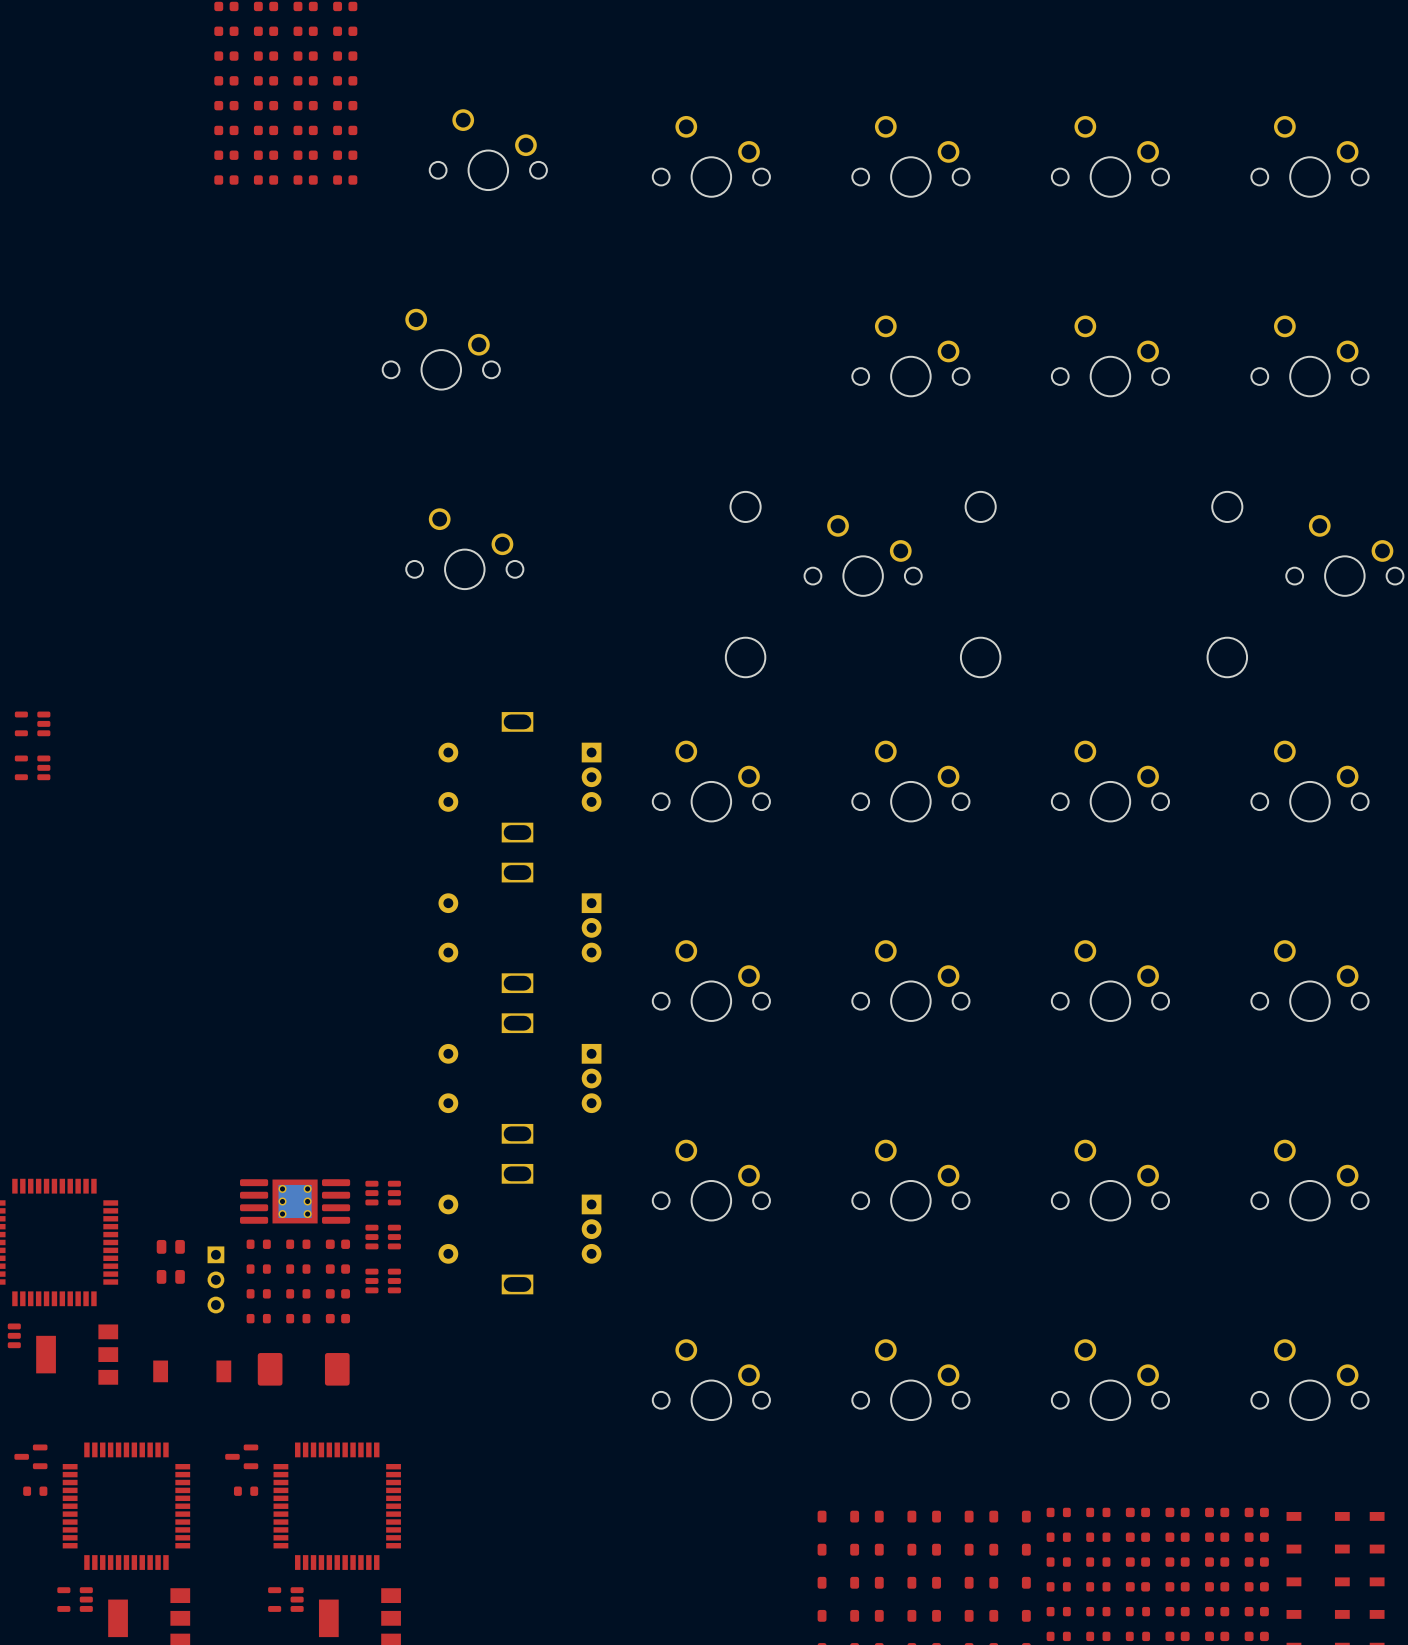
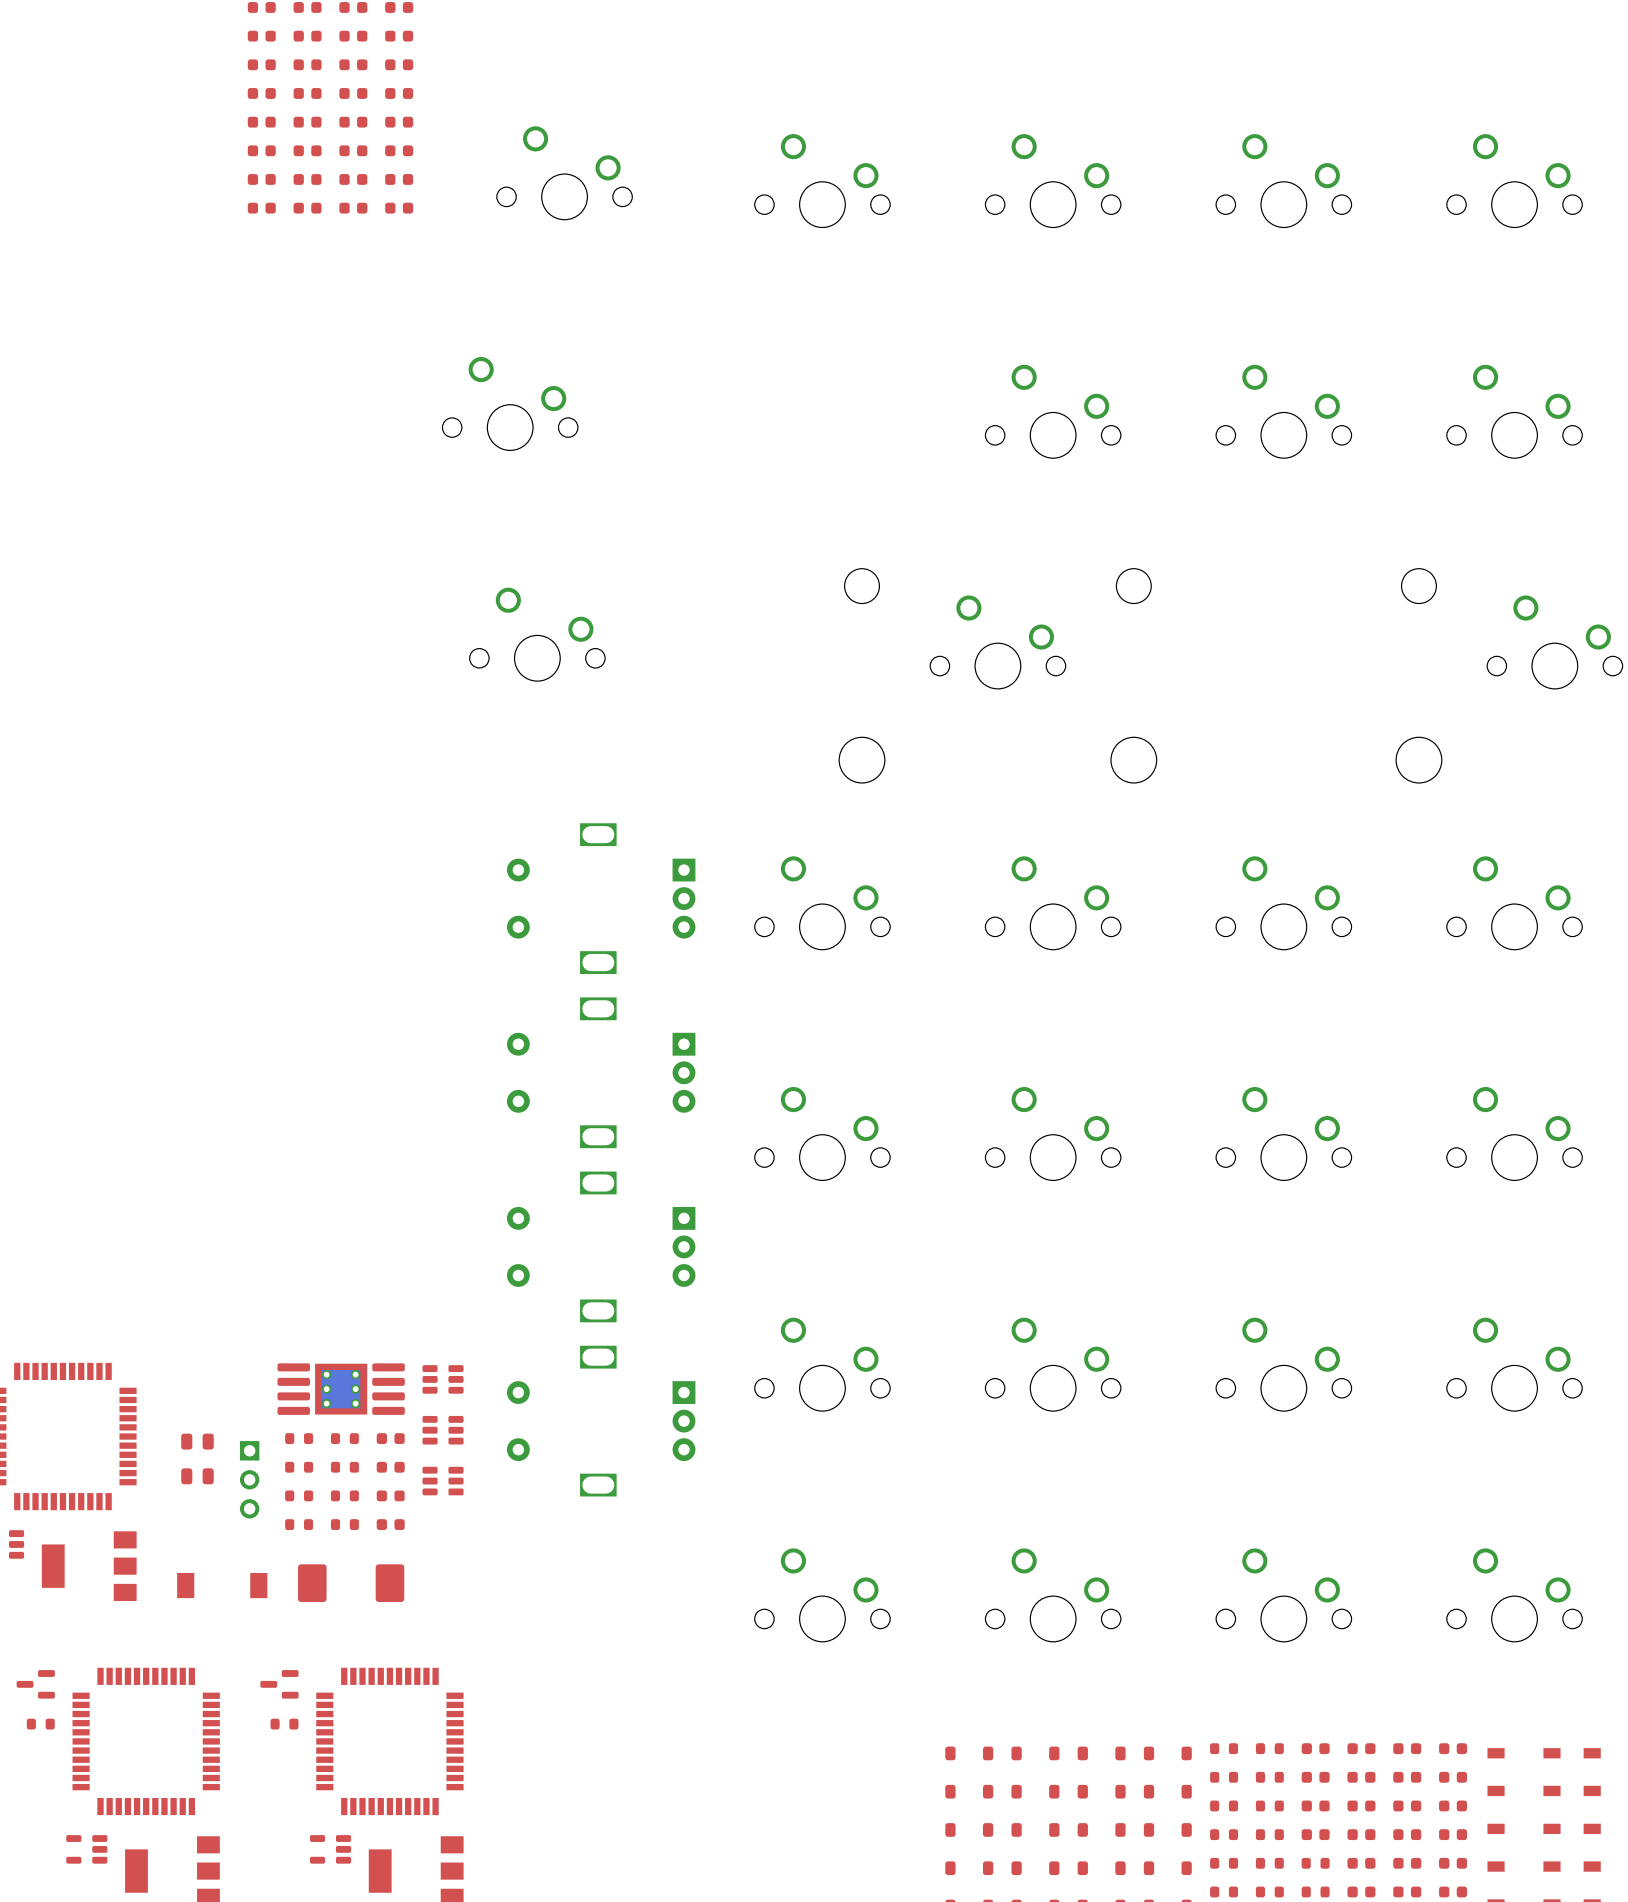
part: (32, 723) -> none
part: (32, 767) -> none

